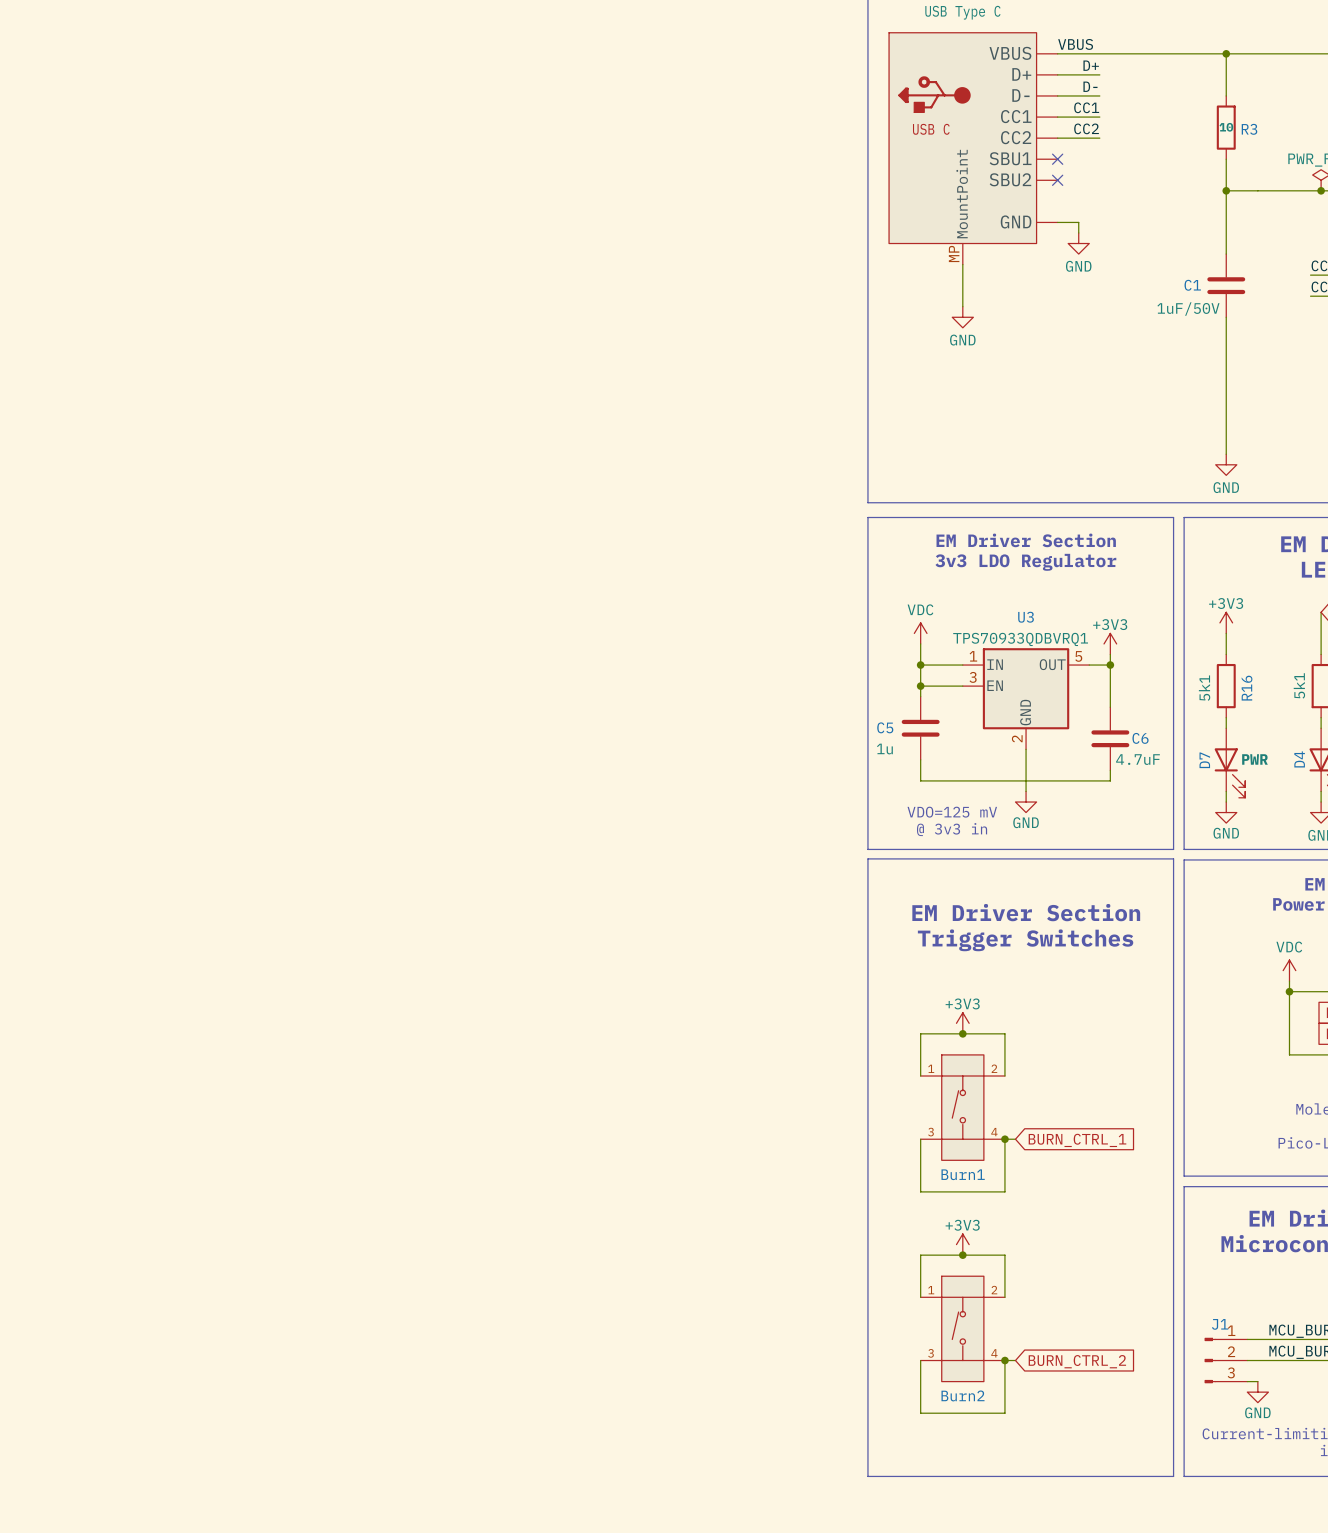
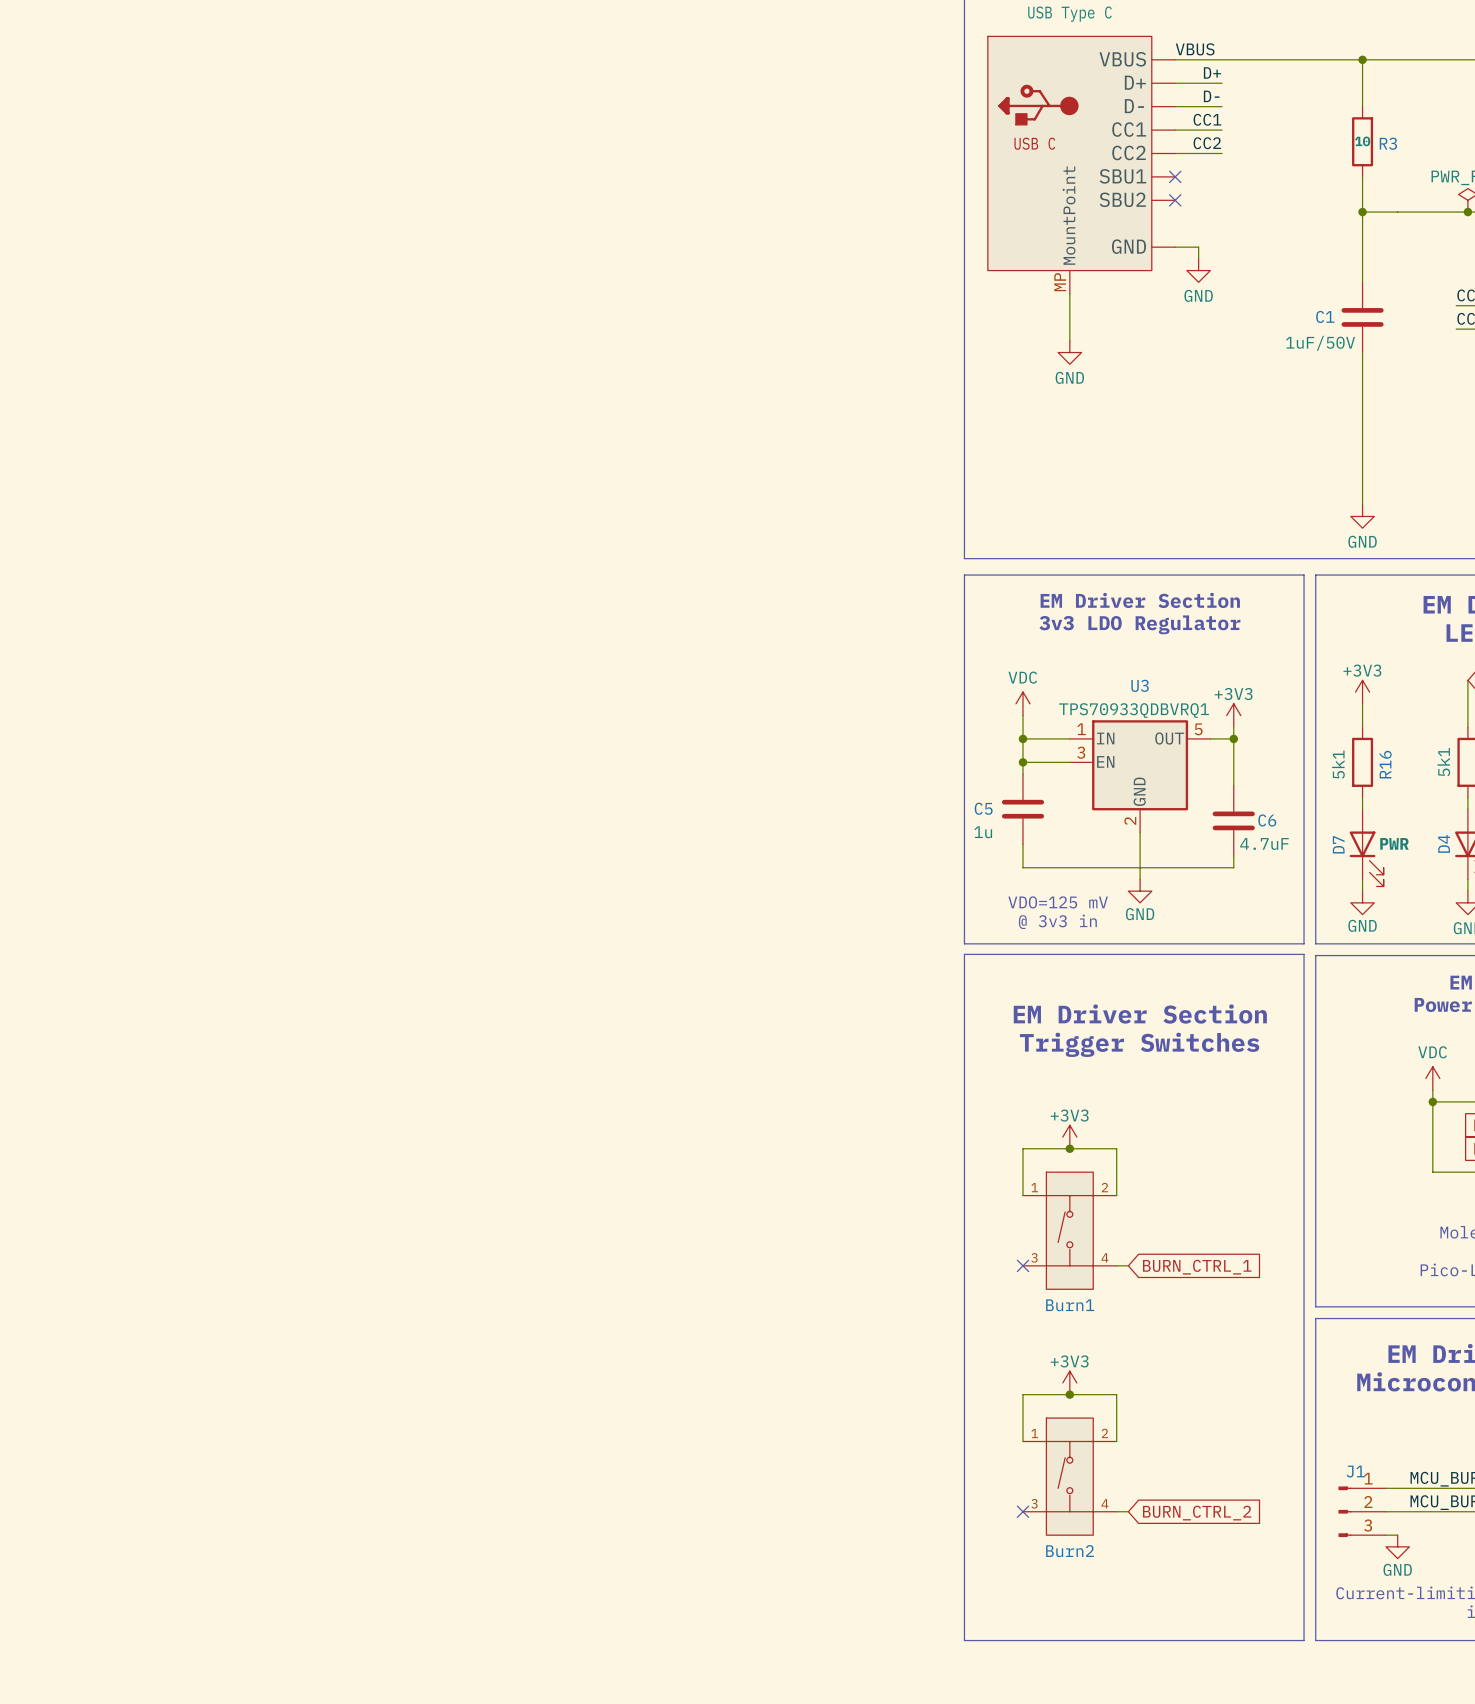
wire: (920, 1139) (920, 1191) (1004, 1191) (1004, 1139) -> none
no-connect mark: none -> (1022, 1265)
junction: (1004, 1139) -> none
wire: (920, 1360) (920, 1413) (1004, 1413) (1004, 1360) -> none
no-connect mark: none -> (1022, 1511)
junction: (1004, 1360) -> none

